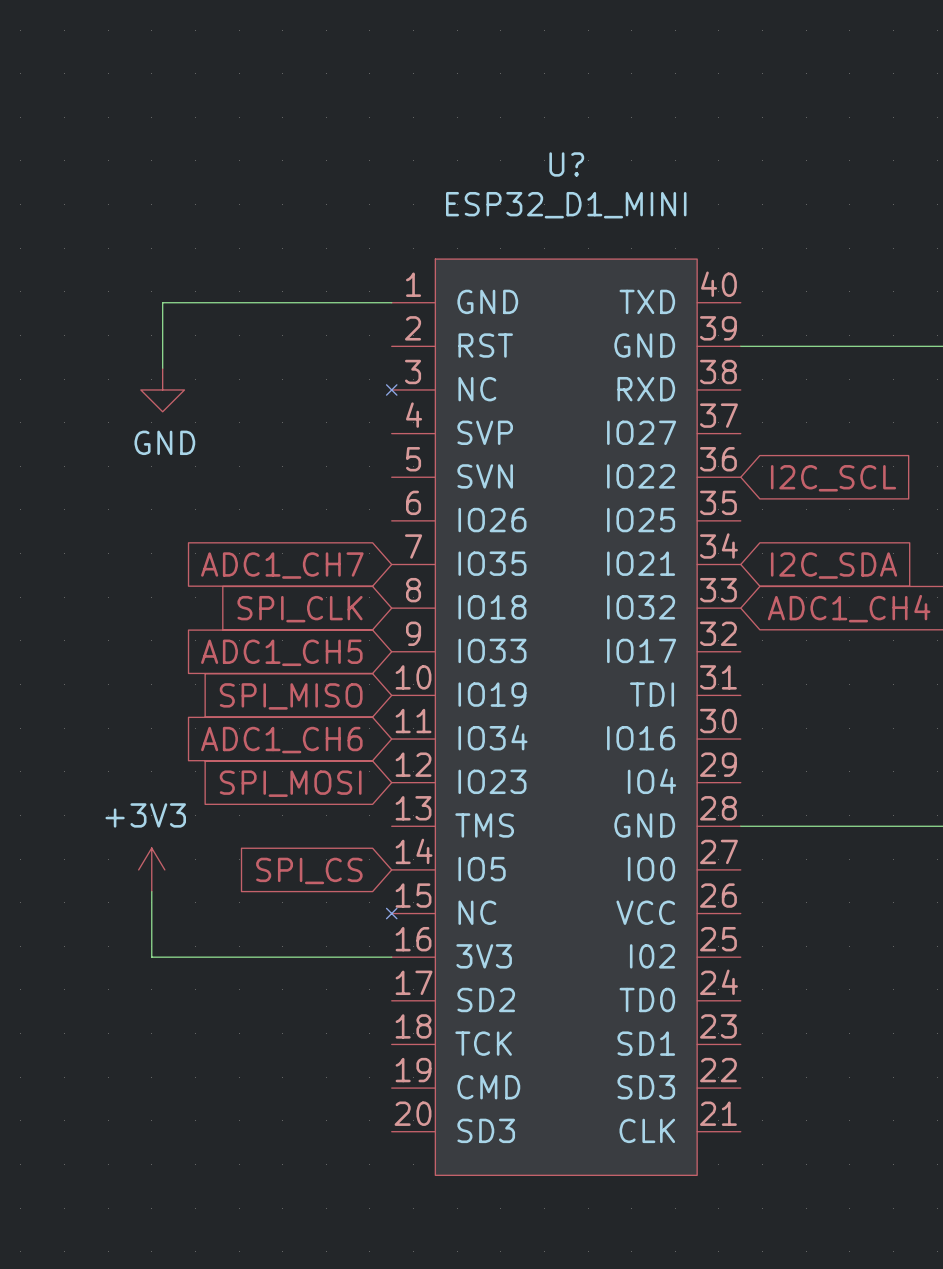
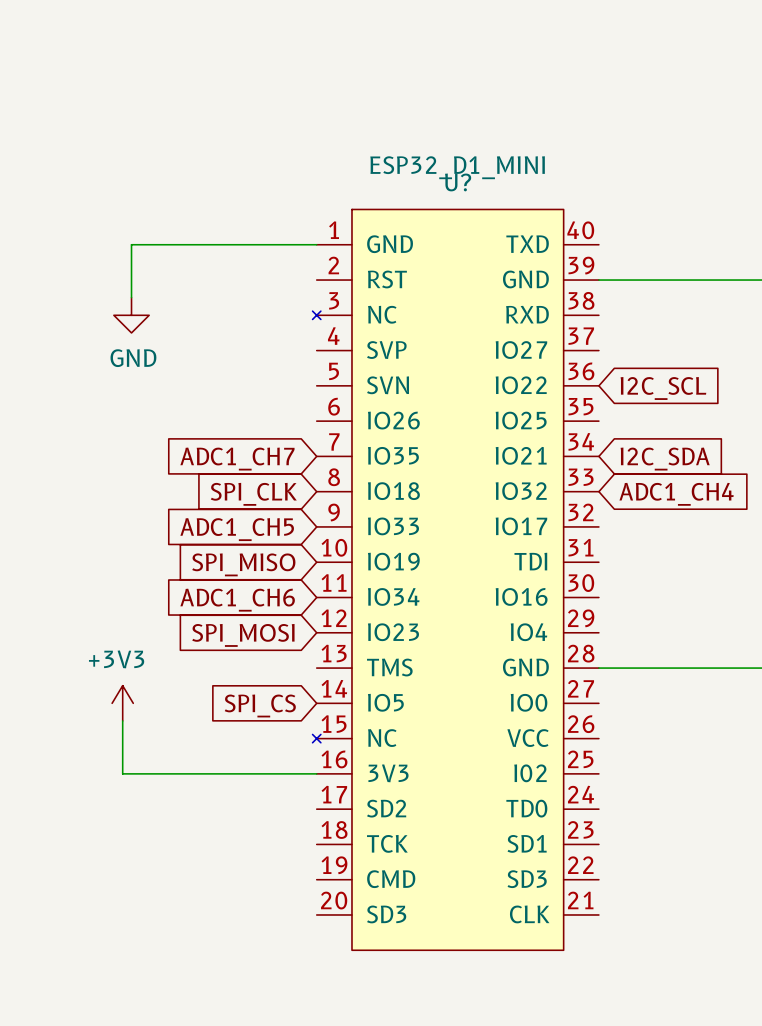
U? name position: U? (566, 164) -> U? (458, 182)

